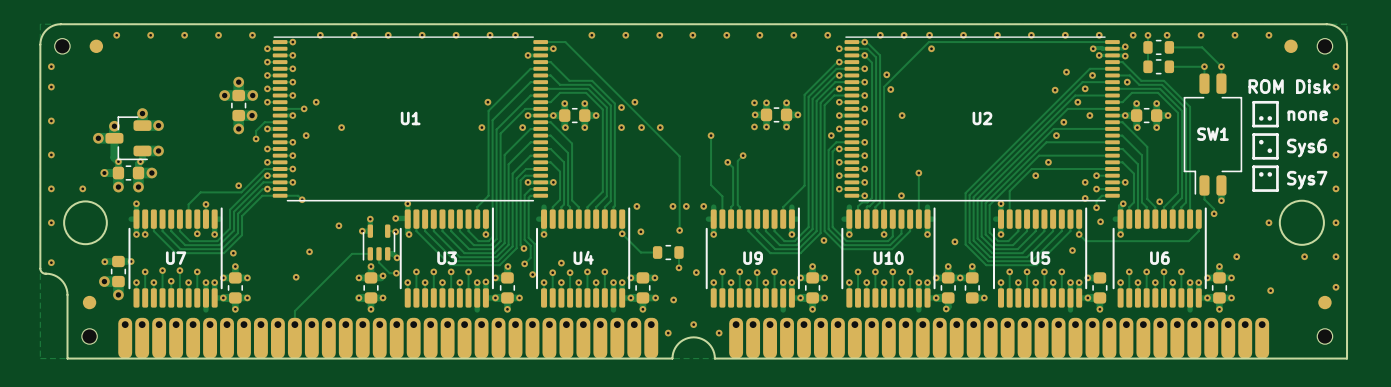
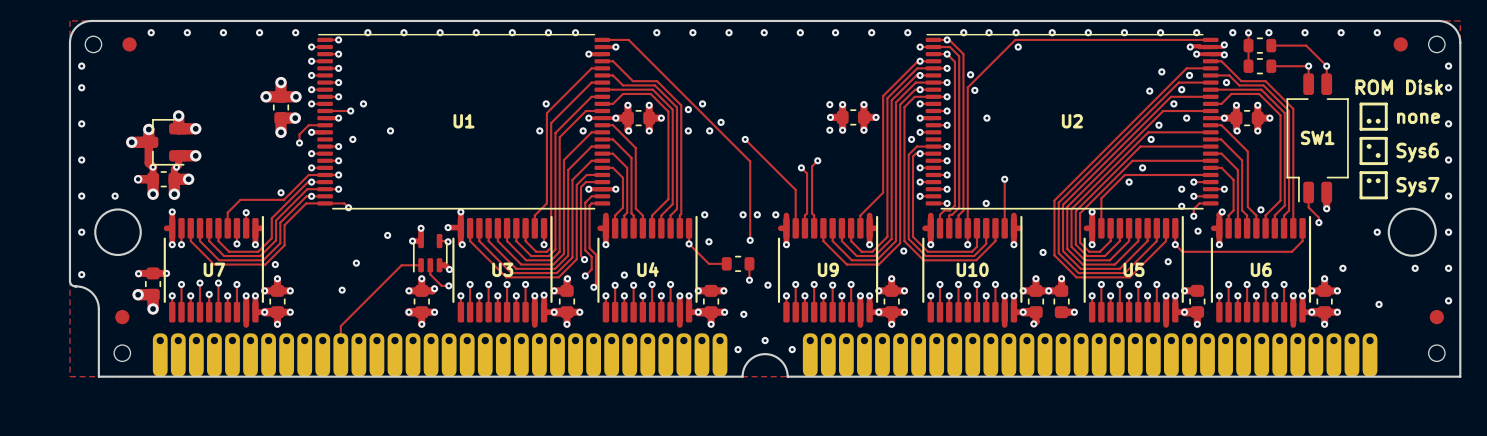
via: none -> (721, 122)
via: (660, 127) -> none
via: none -> (745, 139)
track: (711, 135) (711, 185) (722, 196) -> (745, 139) (795, 189) (795, 204)
via: (711, 135) -> none

